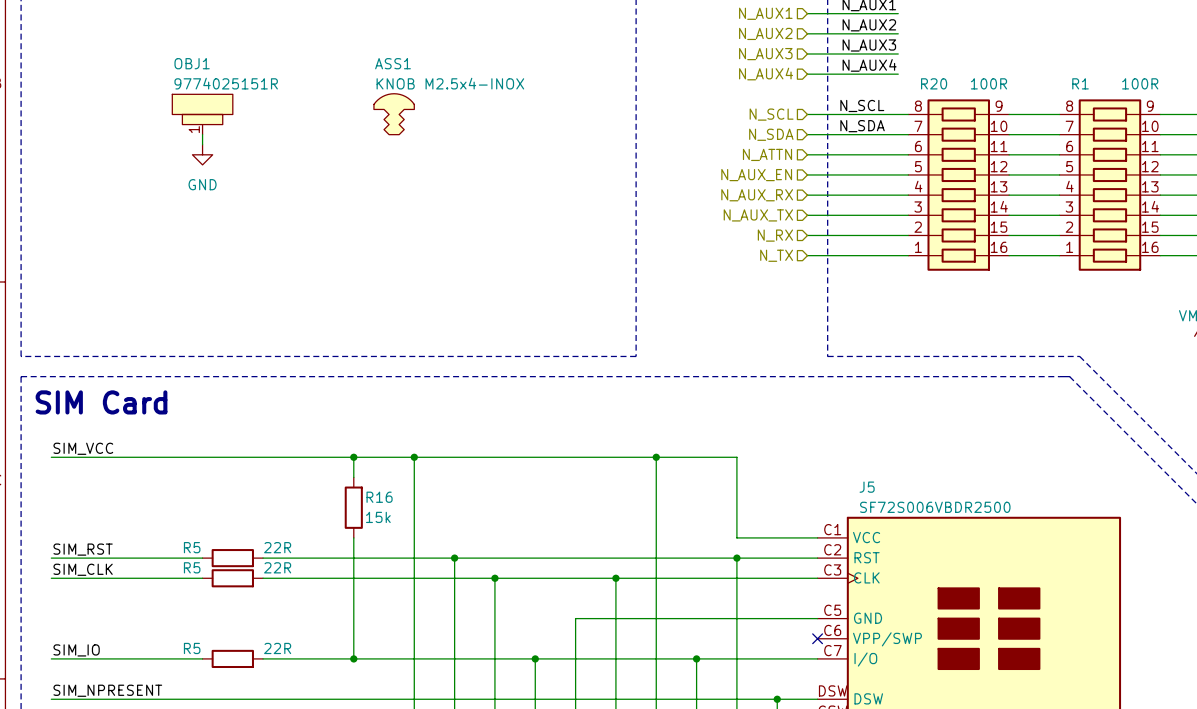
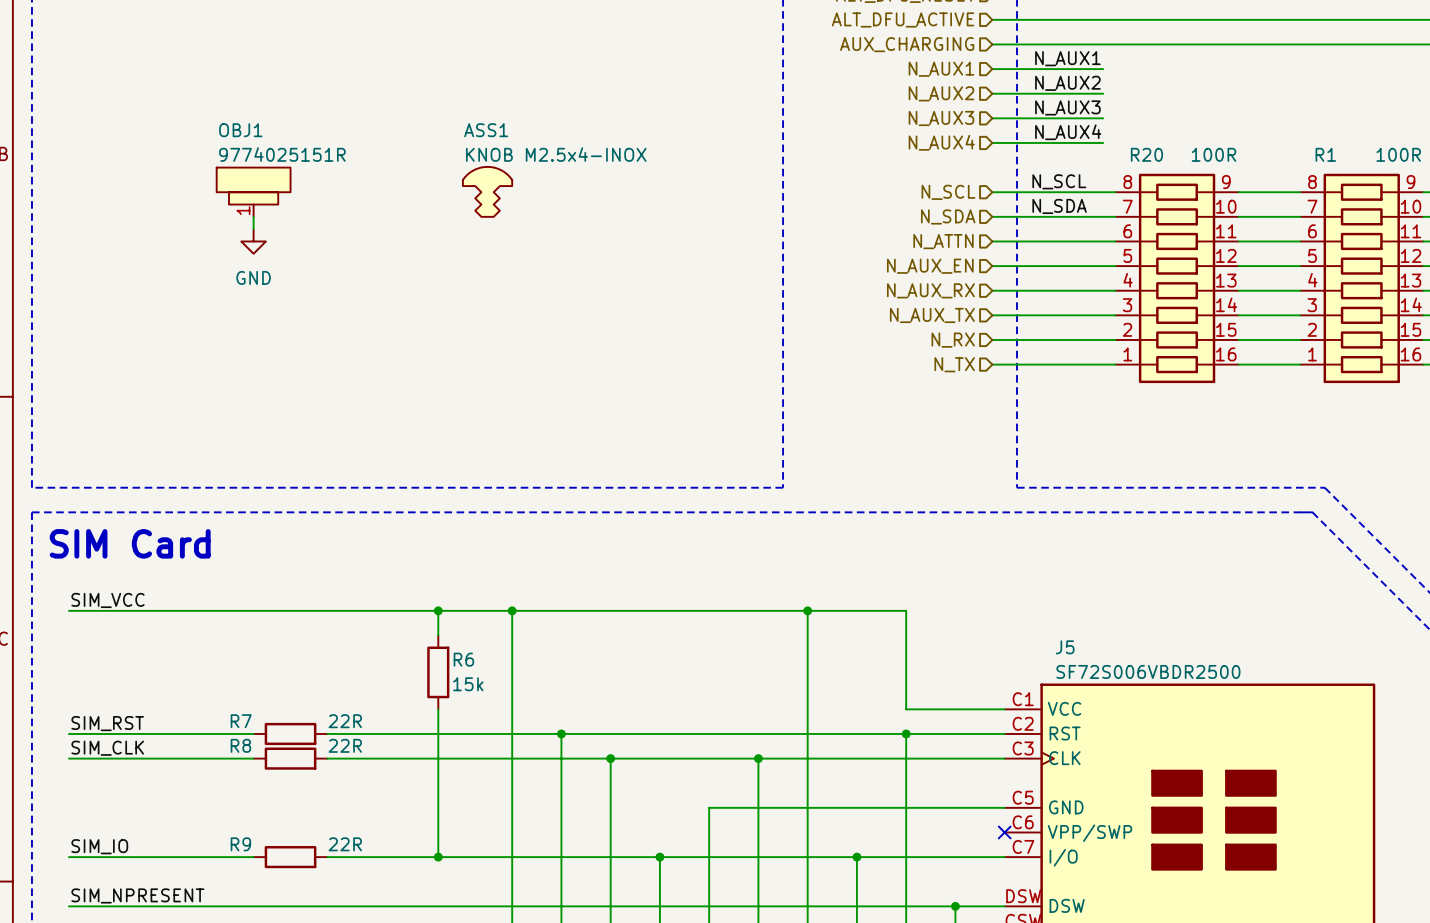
R16 name: R16 (379, 497) -> R6 (463, 659)
R5 name: R5 (192, 547) -> R7 (241, 721)
R5 name: R5 (192, 567) -> R8 (240, 745)
R5 name: R5 (192, 648) -> R9 (240, 844)

